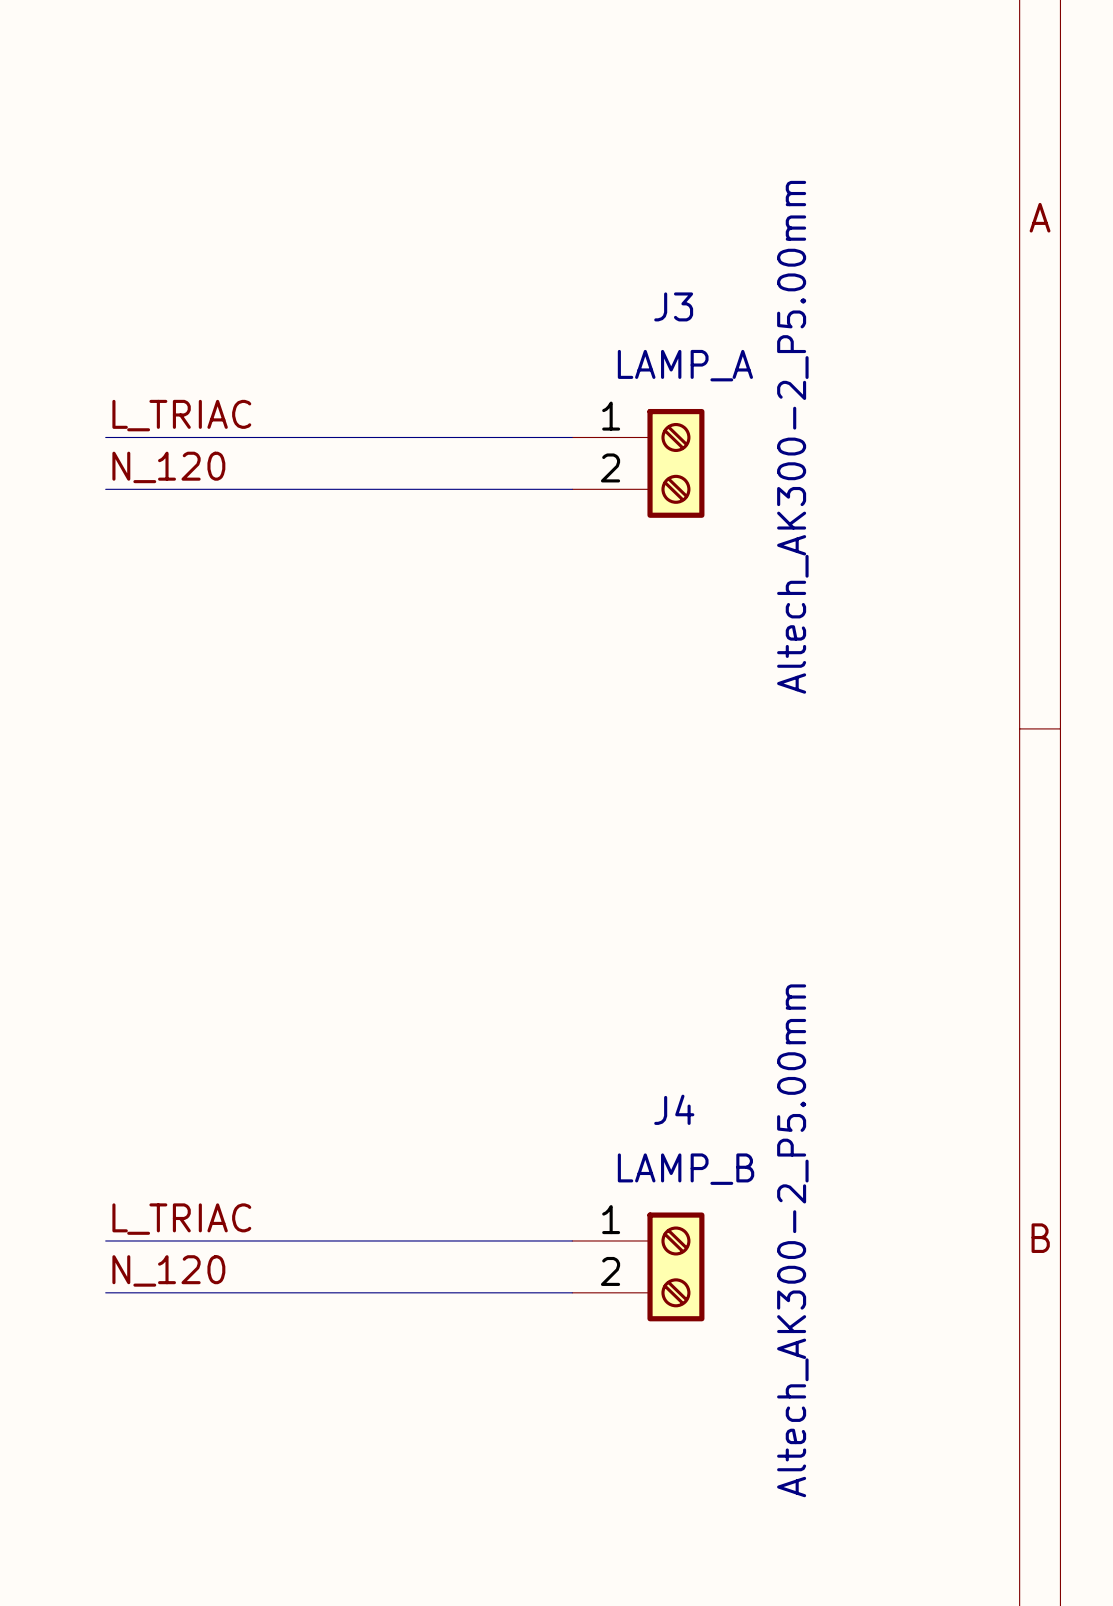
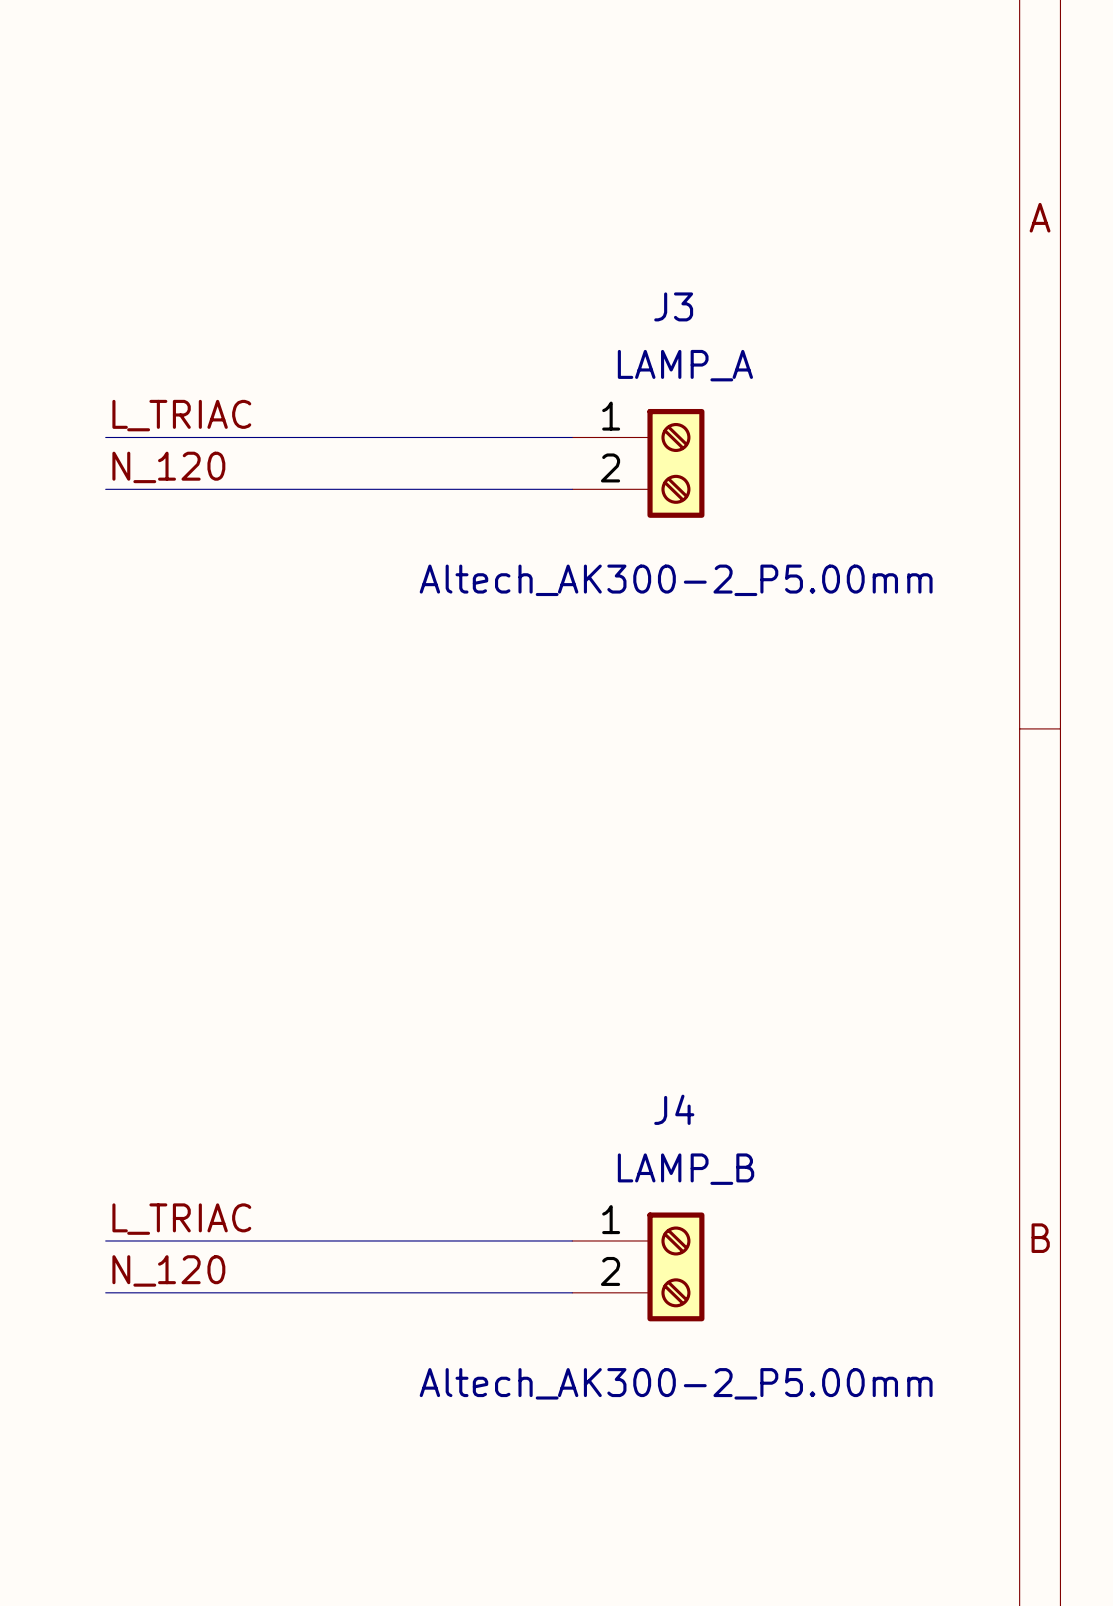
J3 value rotation: 0° (792, 437) -> 90° clockwise (676, 580)
J4 value rotation: 0° (792, 1240) -> 90° clockwise (676, 1383)

